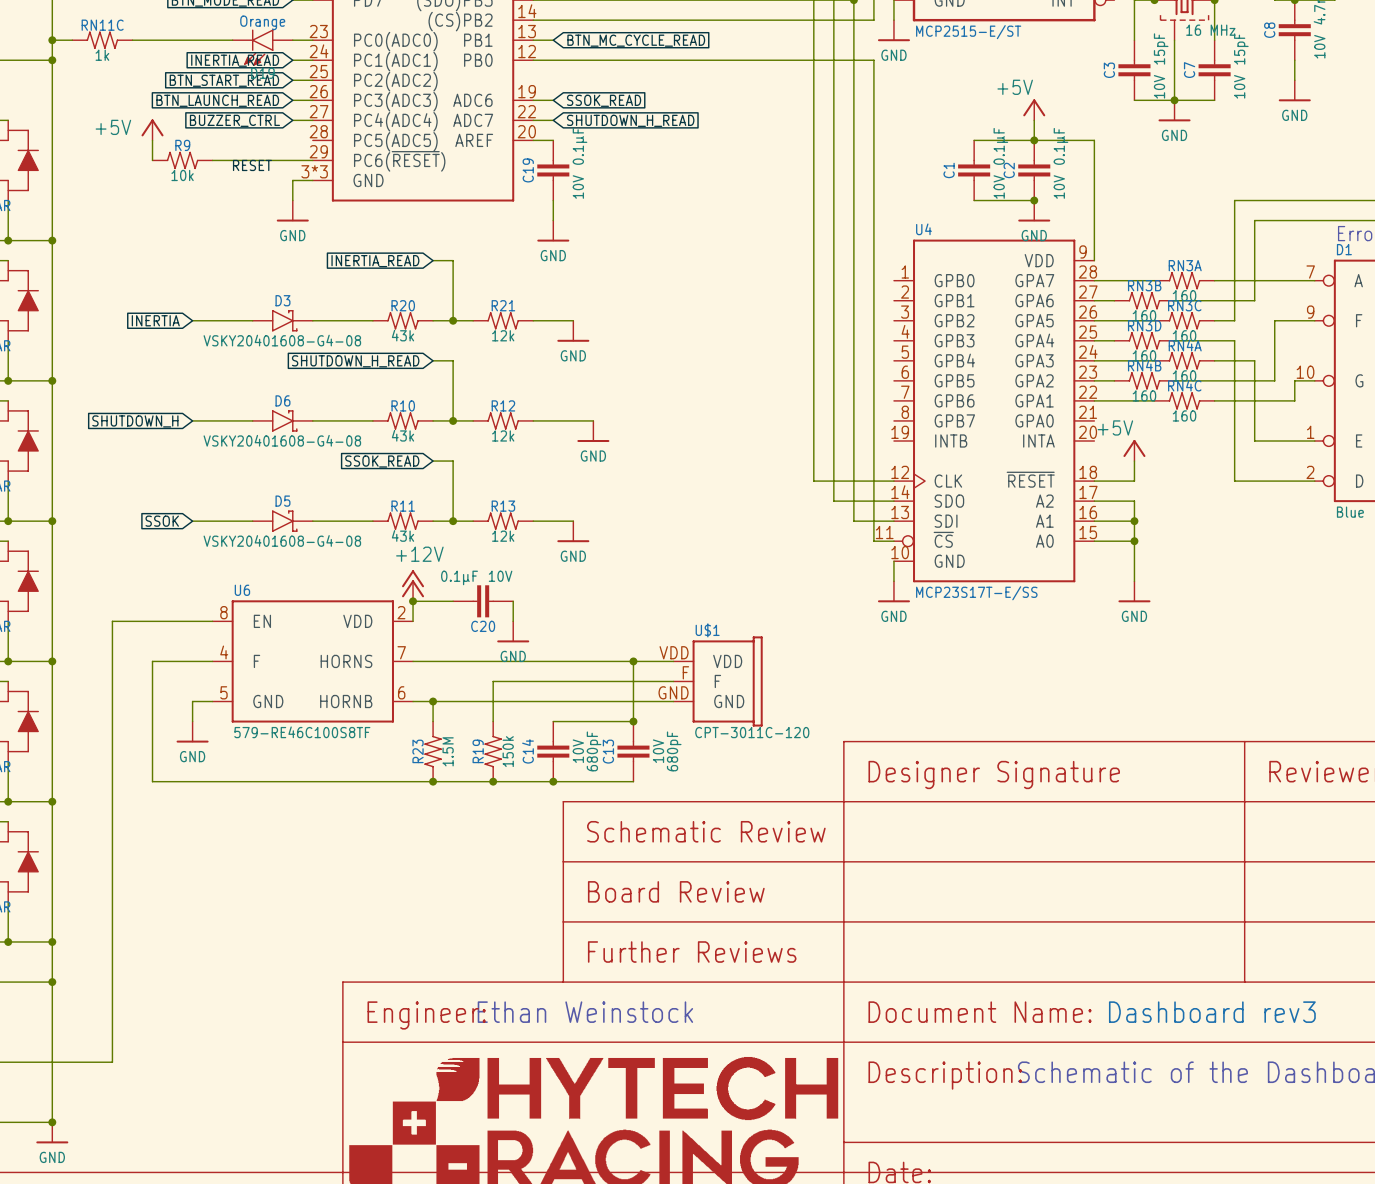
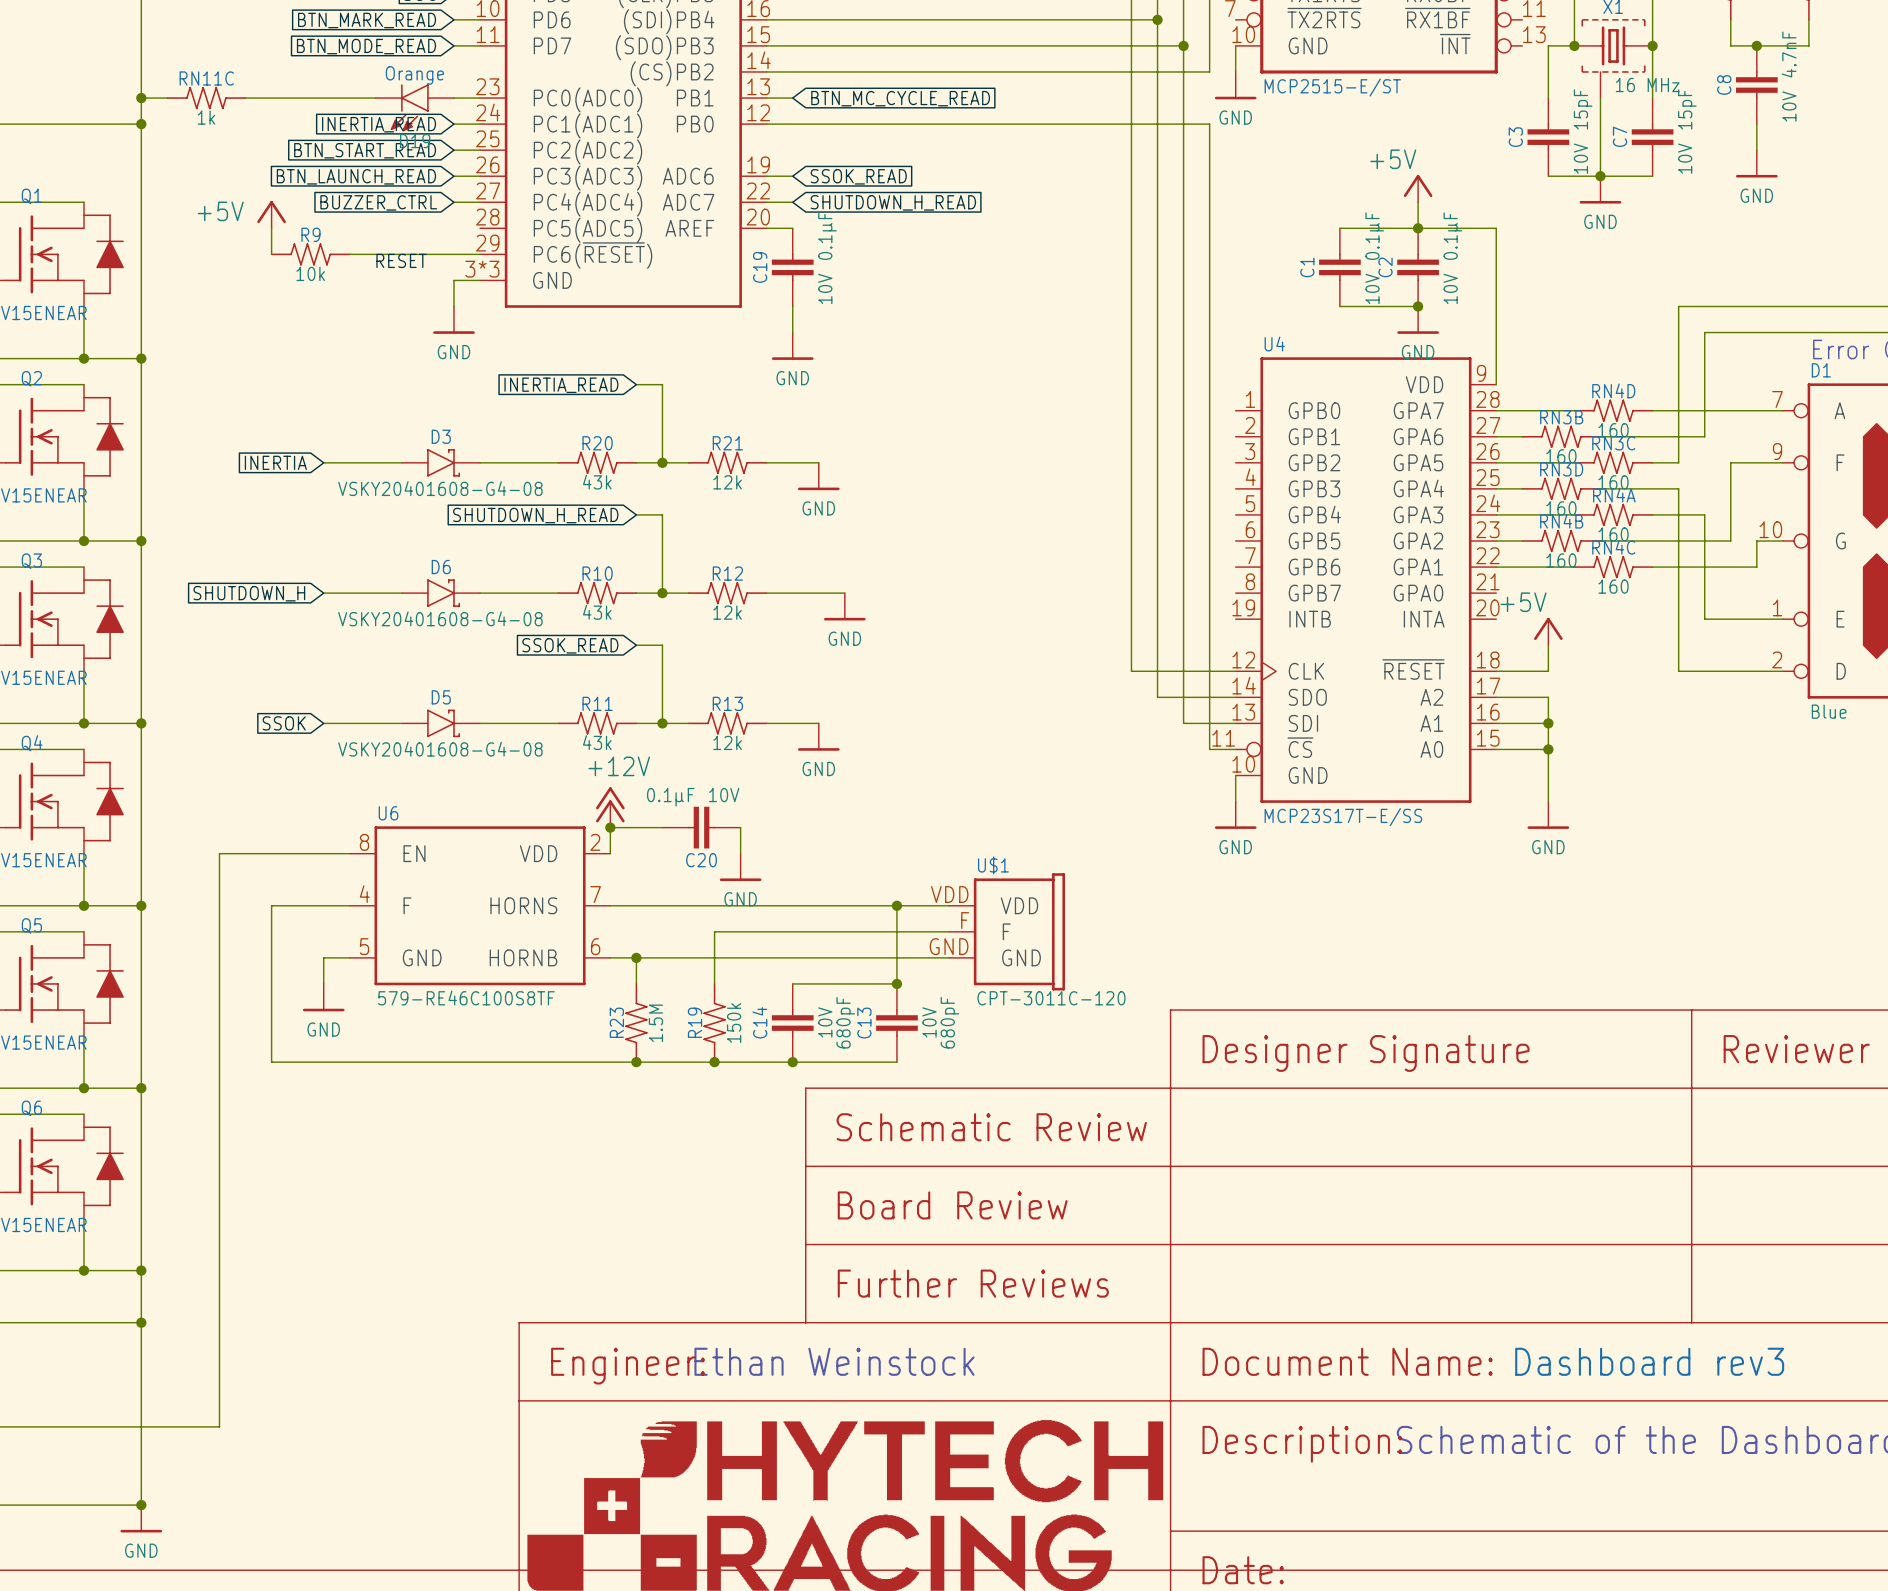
RN3A name: RN3A (1185, 265) -> RN4D (1613, 390)

